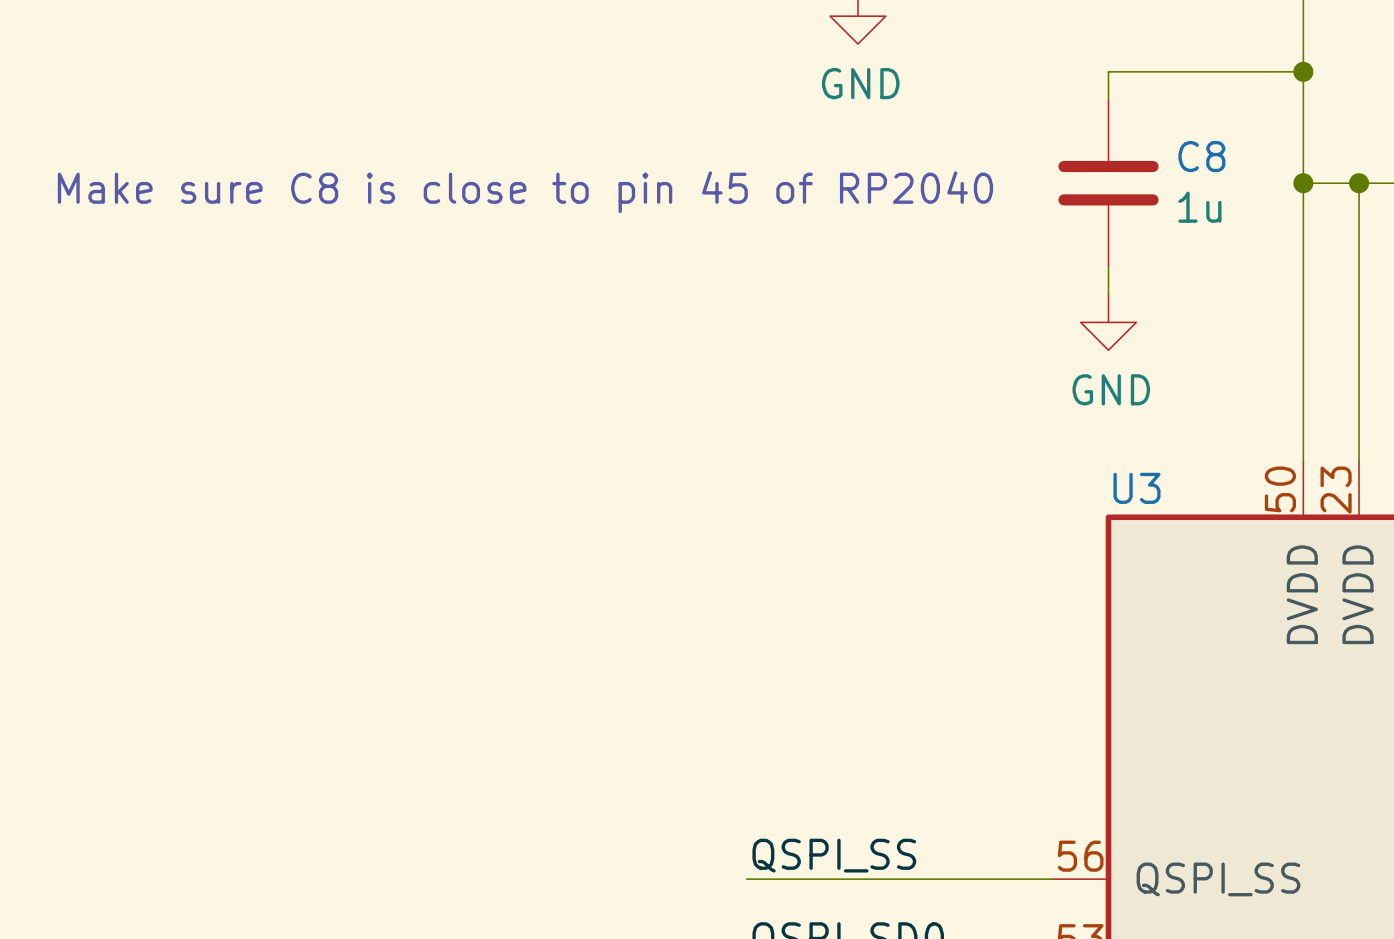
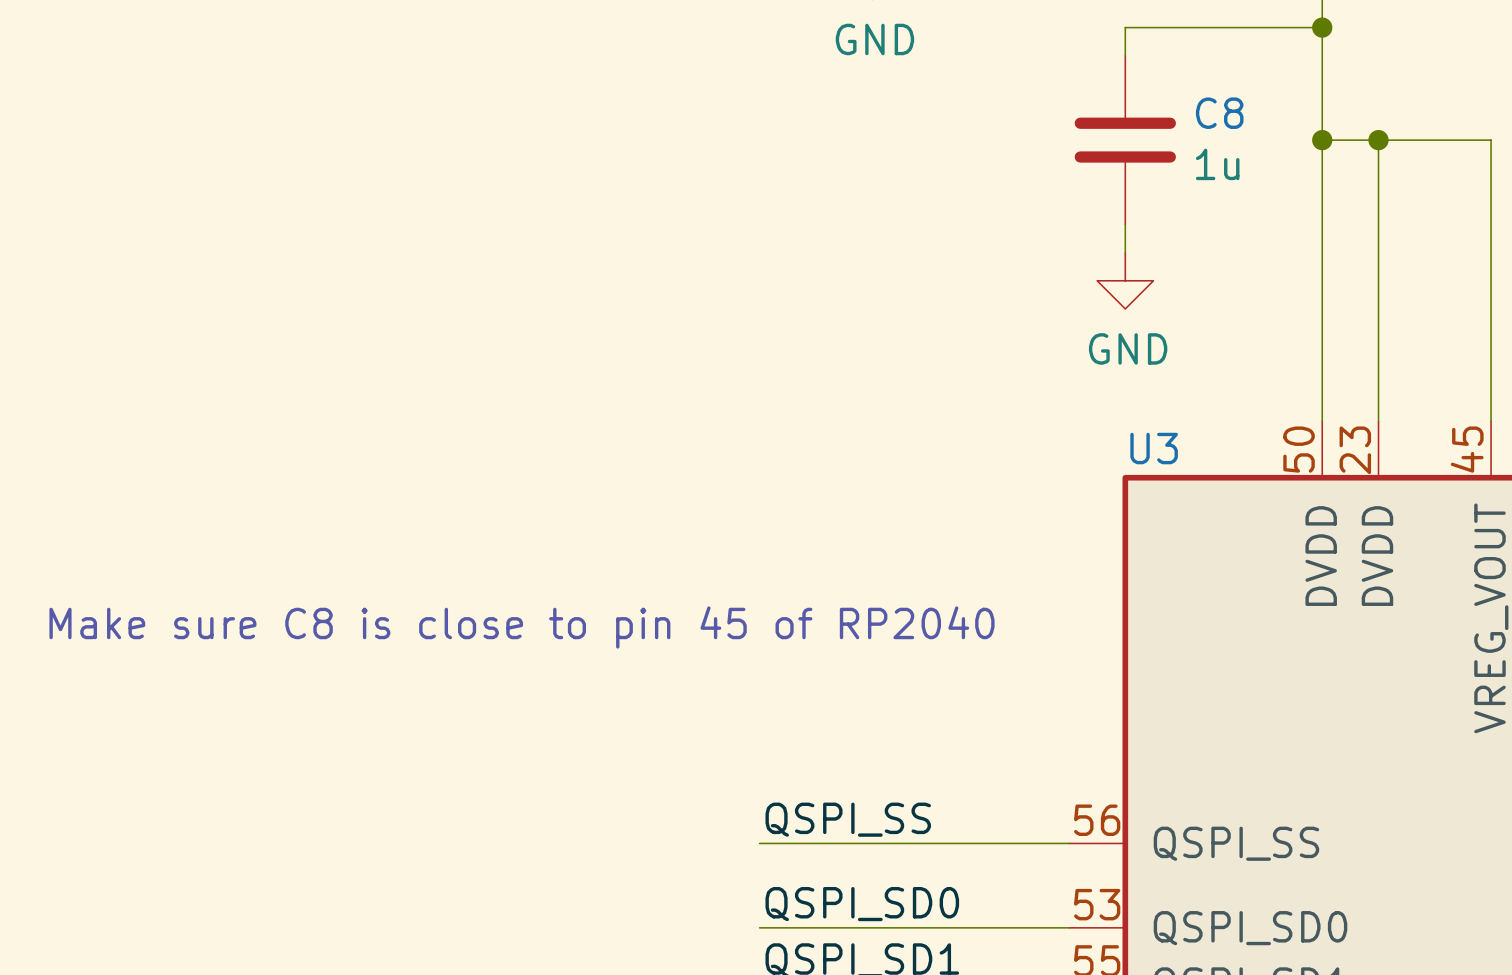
text position: Make sure C8 is close to pin 45 of RP2040 (525, 192) -> Make sure C8 is close to pin 45 of RP2040 (522, 627)

